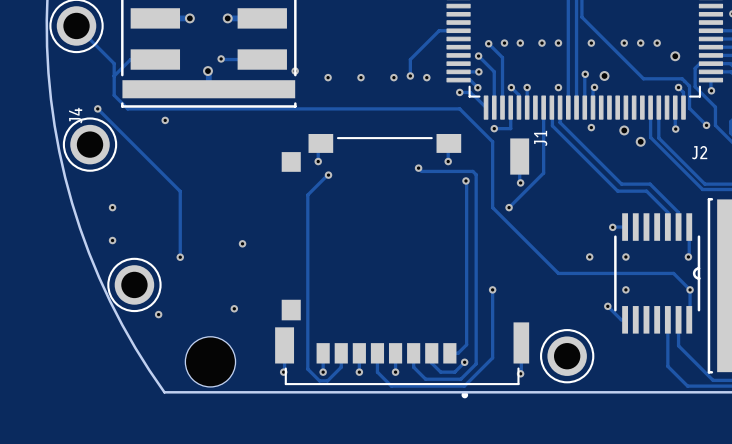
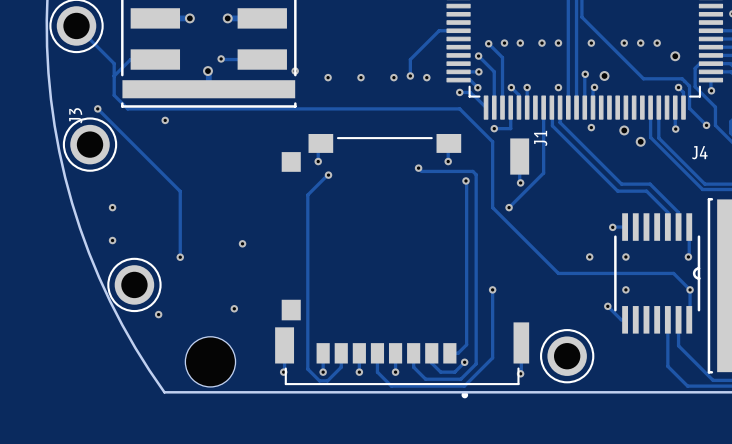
J4 name: J4 (75, 115) -> J3 (75, 115)
J2 name: J2 (699, 152) -> J4 (699, 152)

